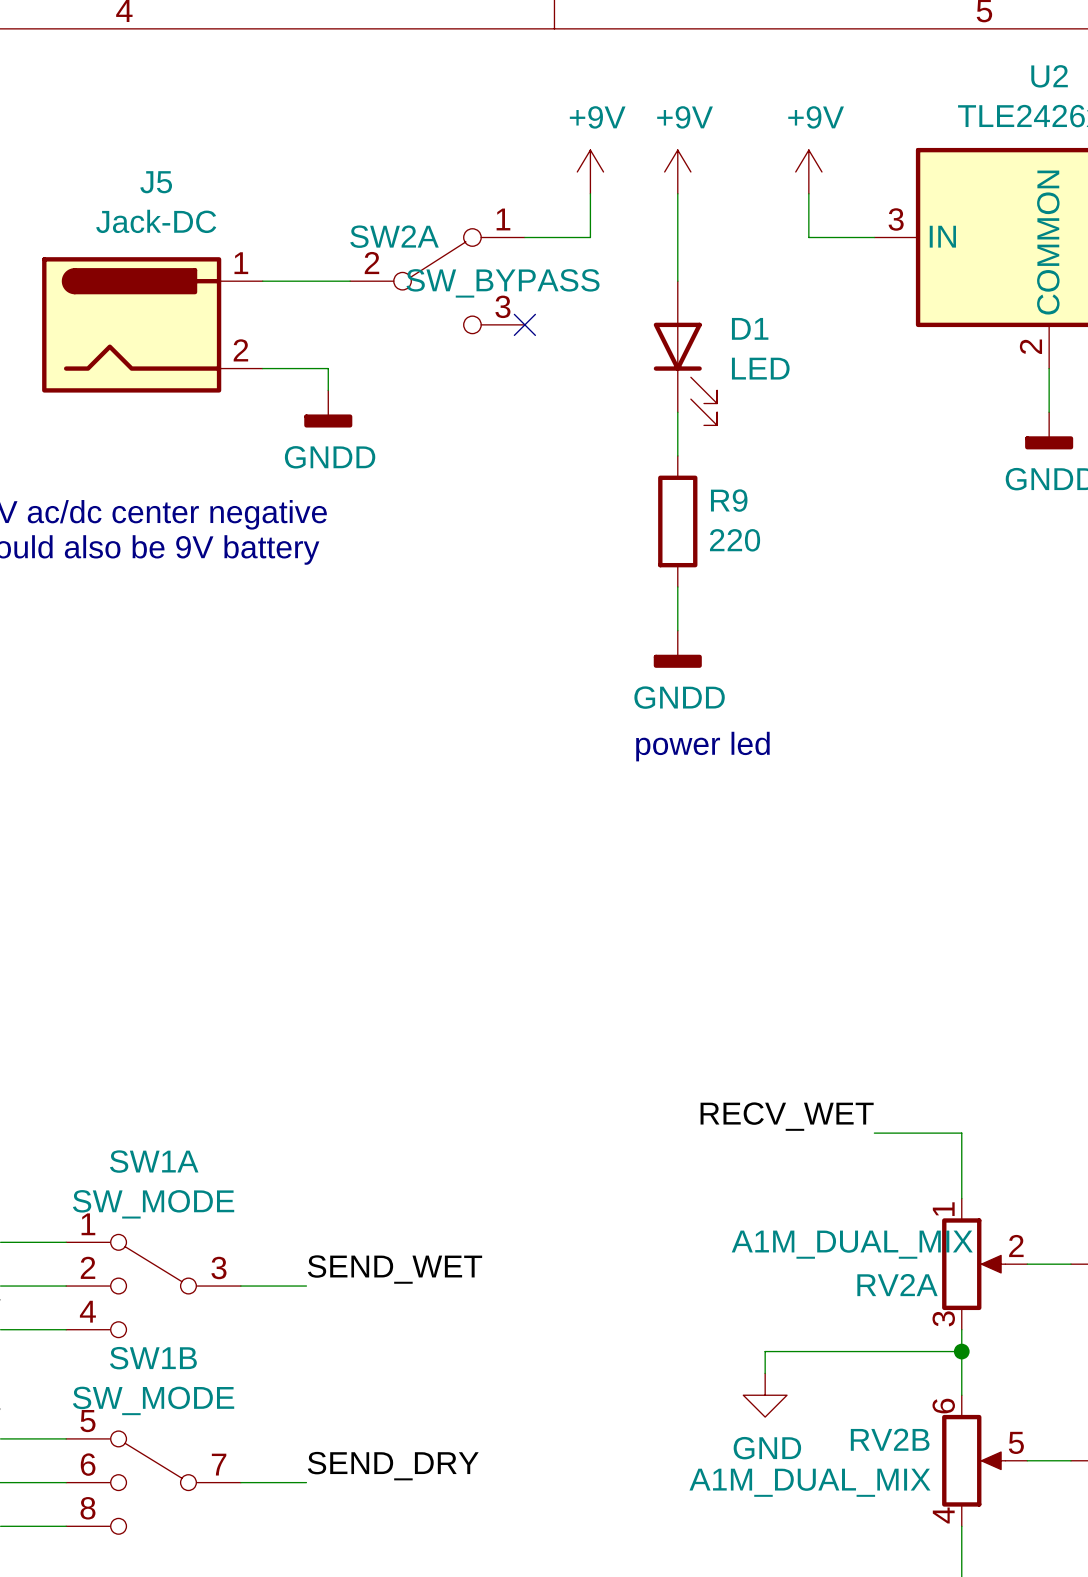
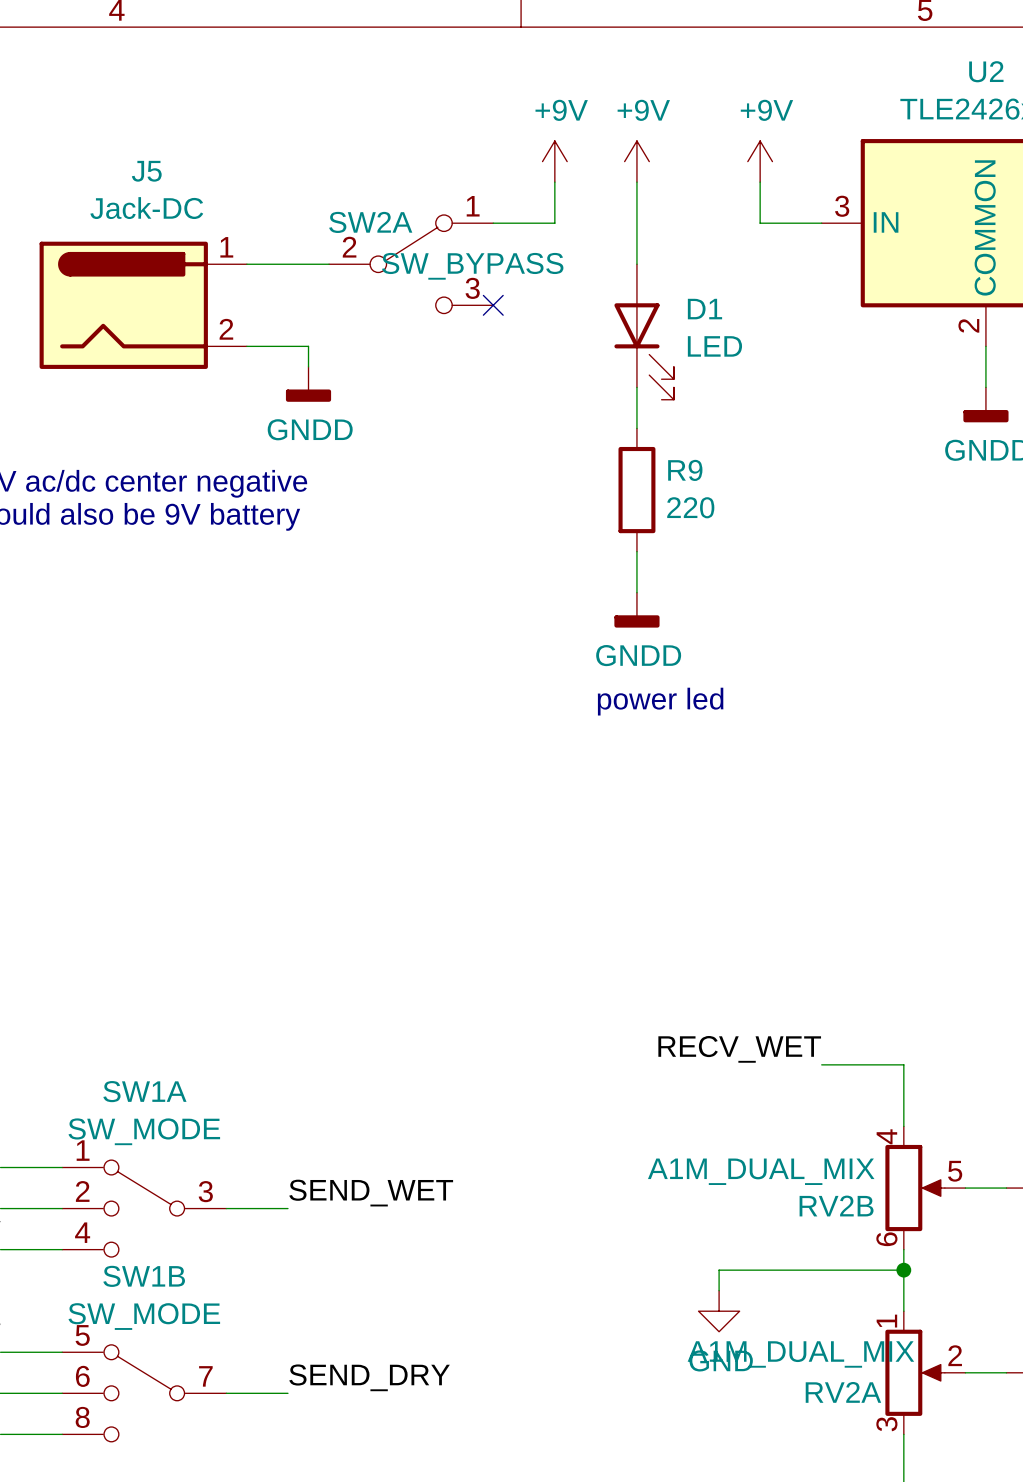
RV2A position: (984, 1264) -> (925, 1372)
RV2B flip: as is (973, 1460) -> up-down (915, 1188)
RV2B position: (984, 1460) -> (925, 1188)

